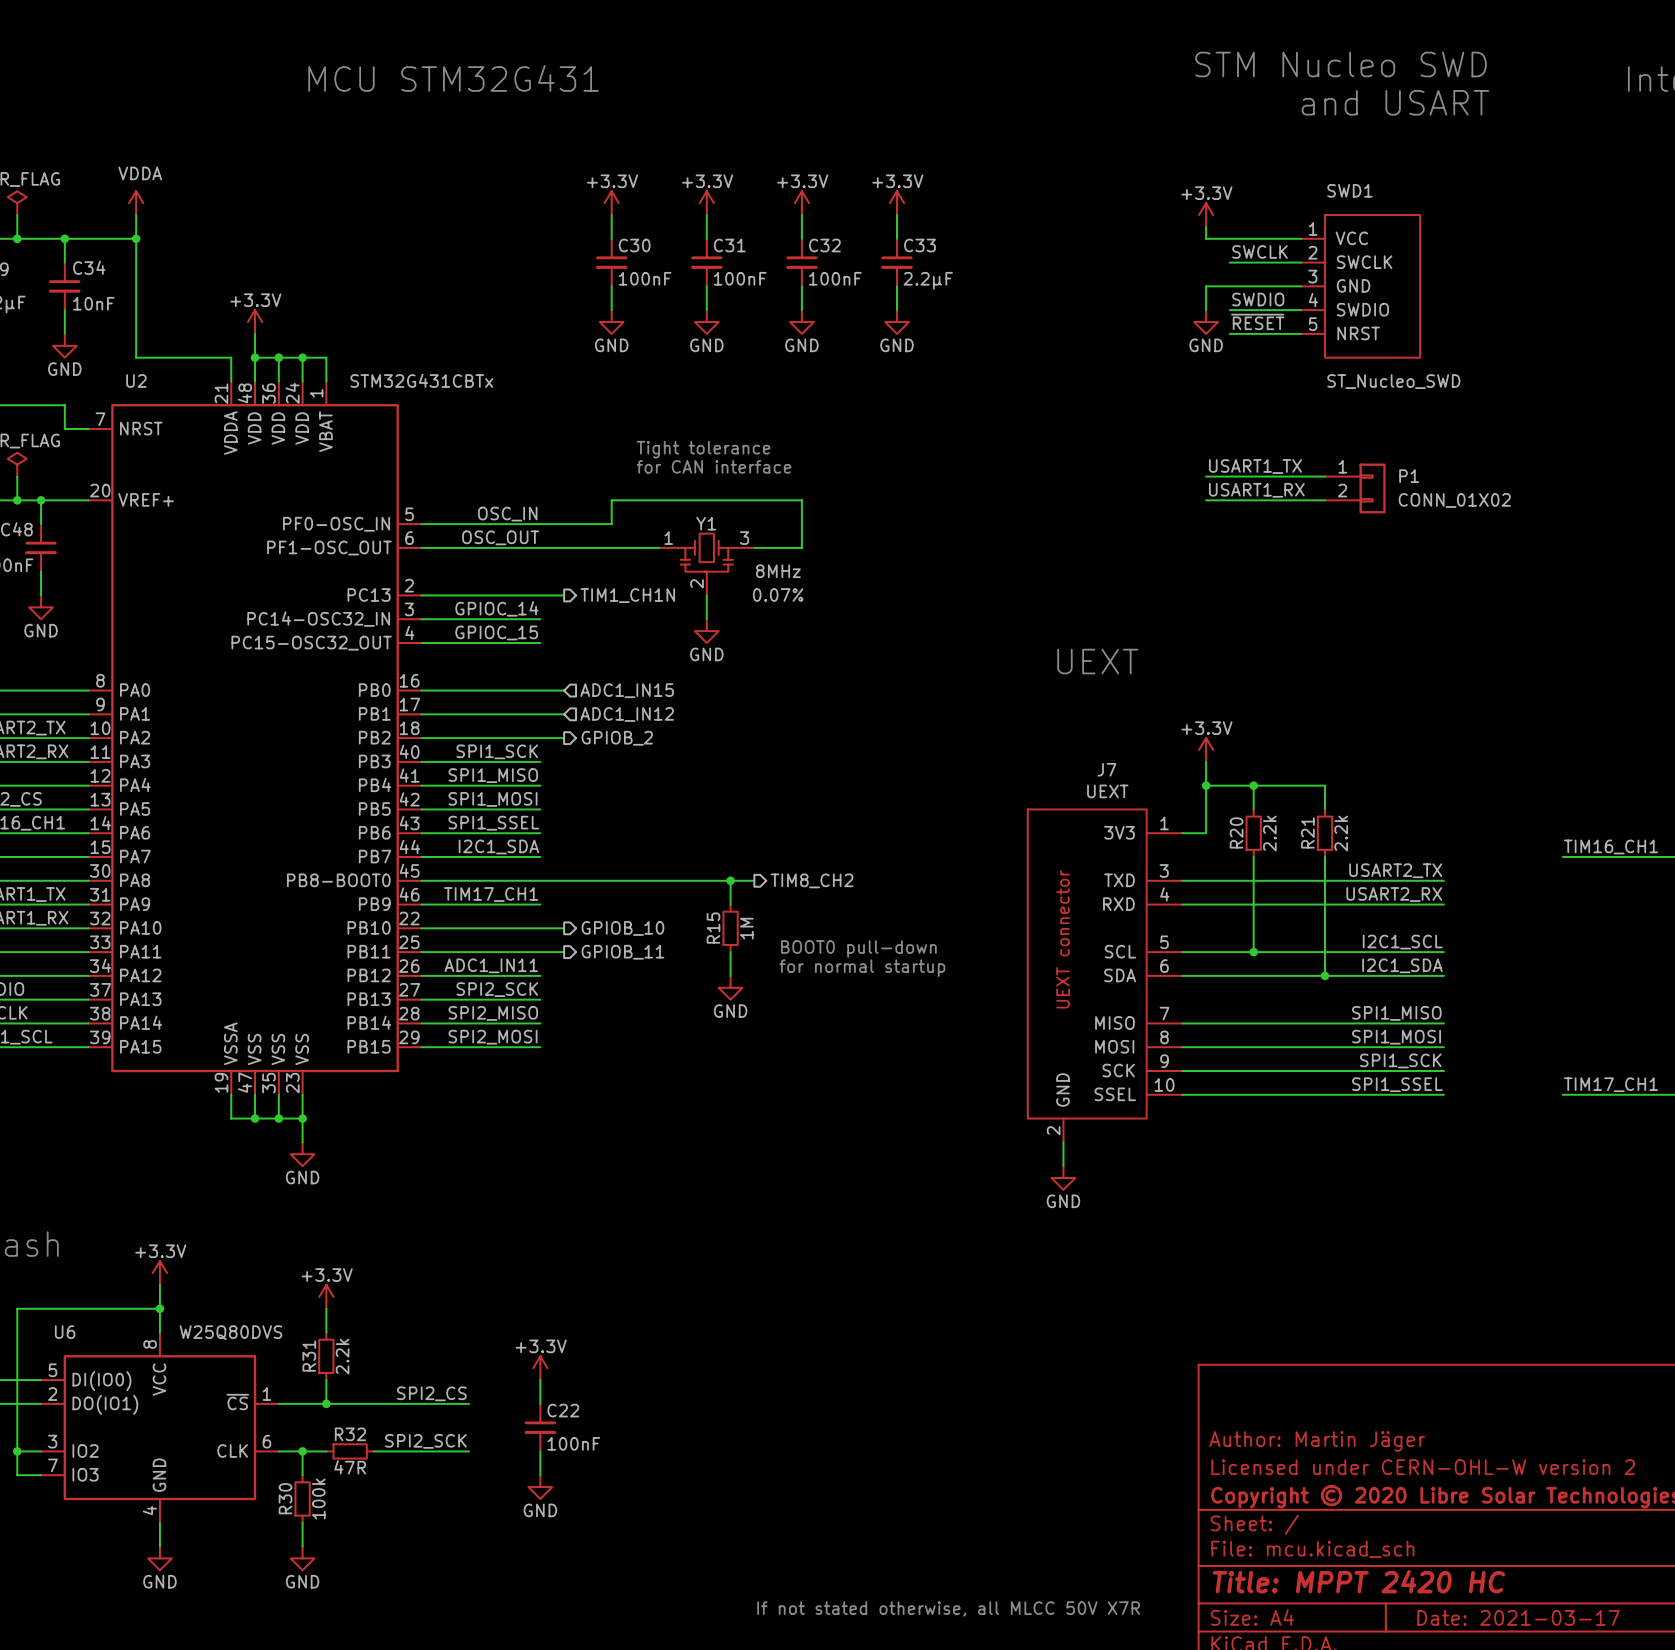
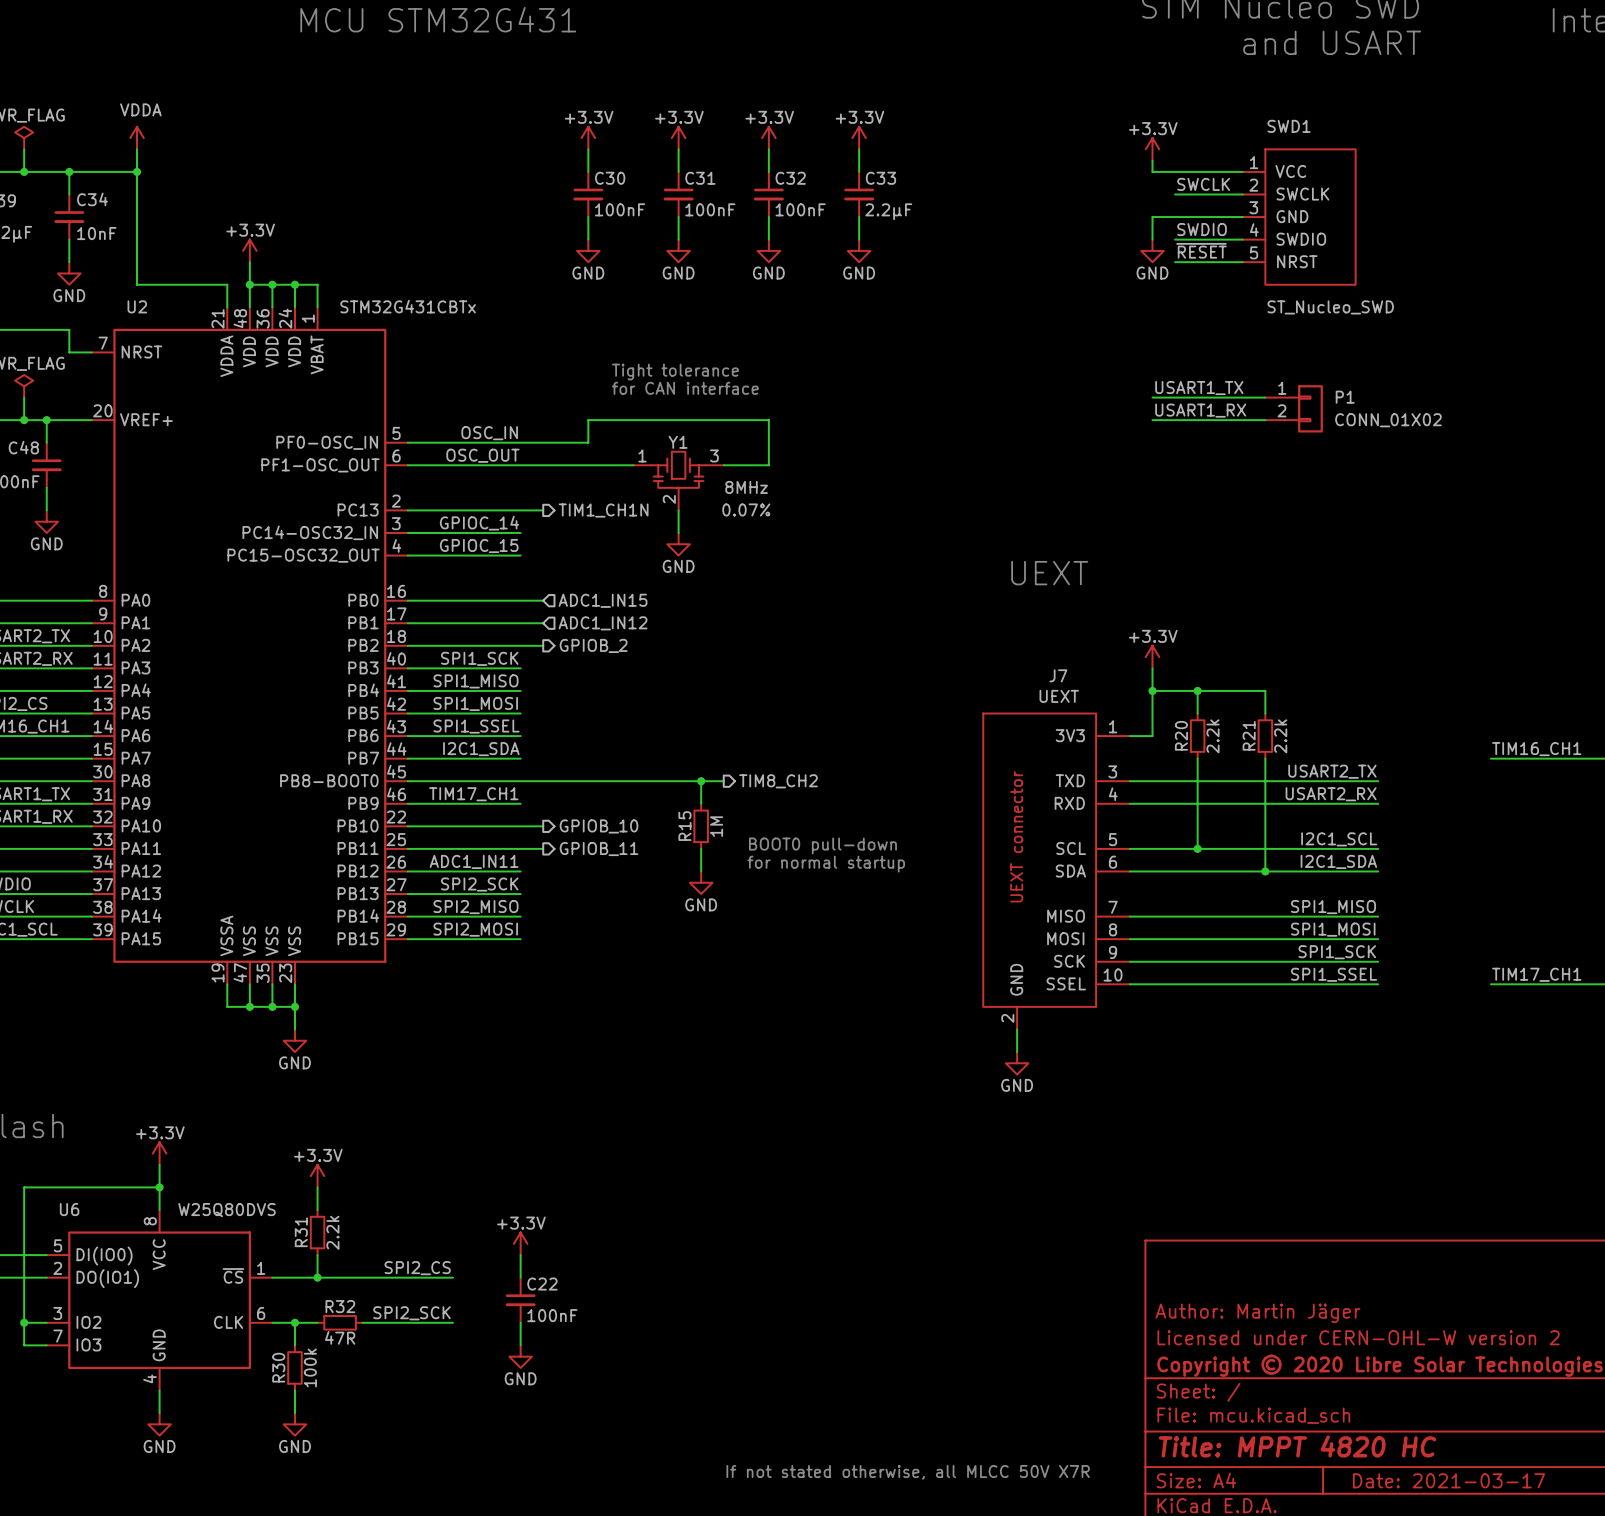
title block: Title: MPPT 2420 HC (1358, 1581) -> Title: MPPT 4820 HC (1297, 1446)

